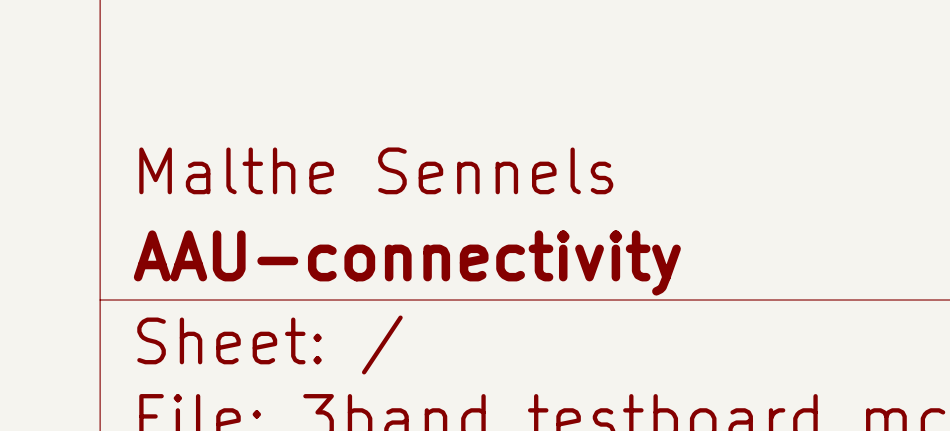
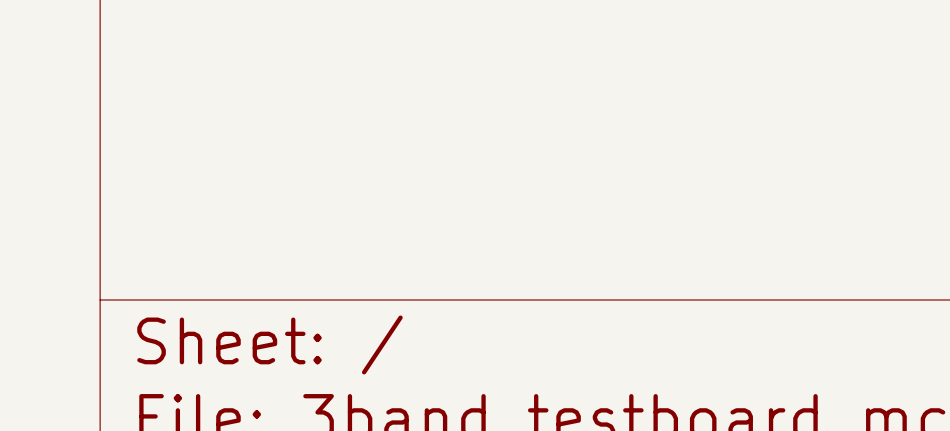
title block: Malthe Sennels (376, 170) -> none
title block: AAU-connectivity (407, 262) -> none

